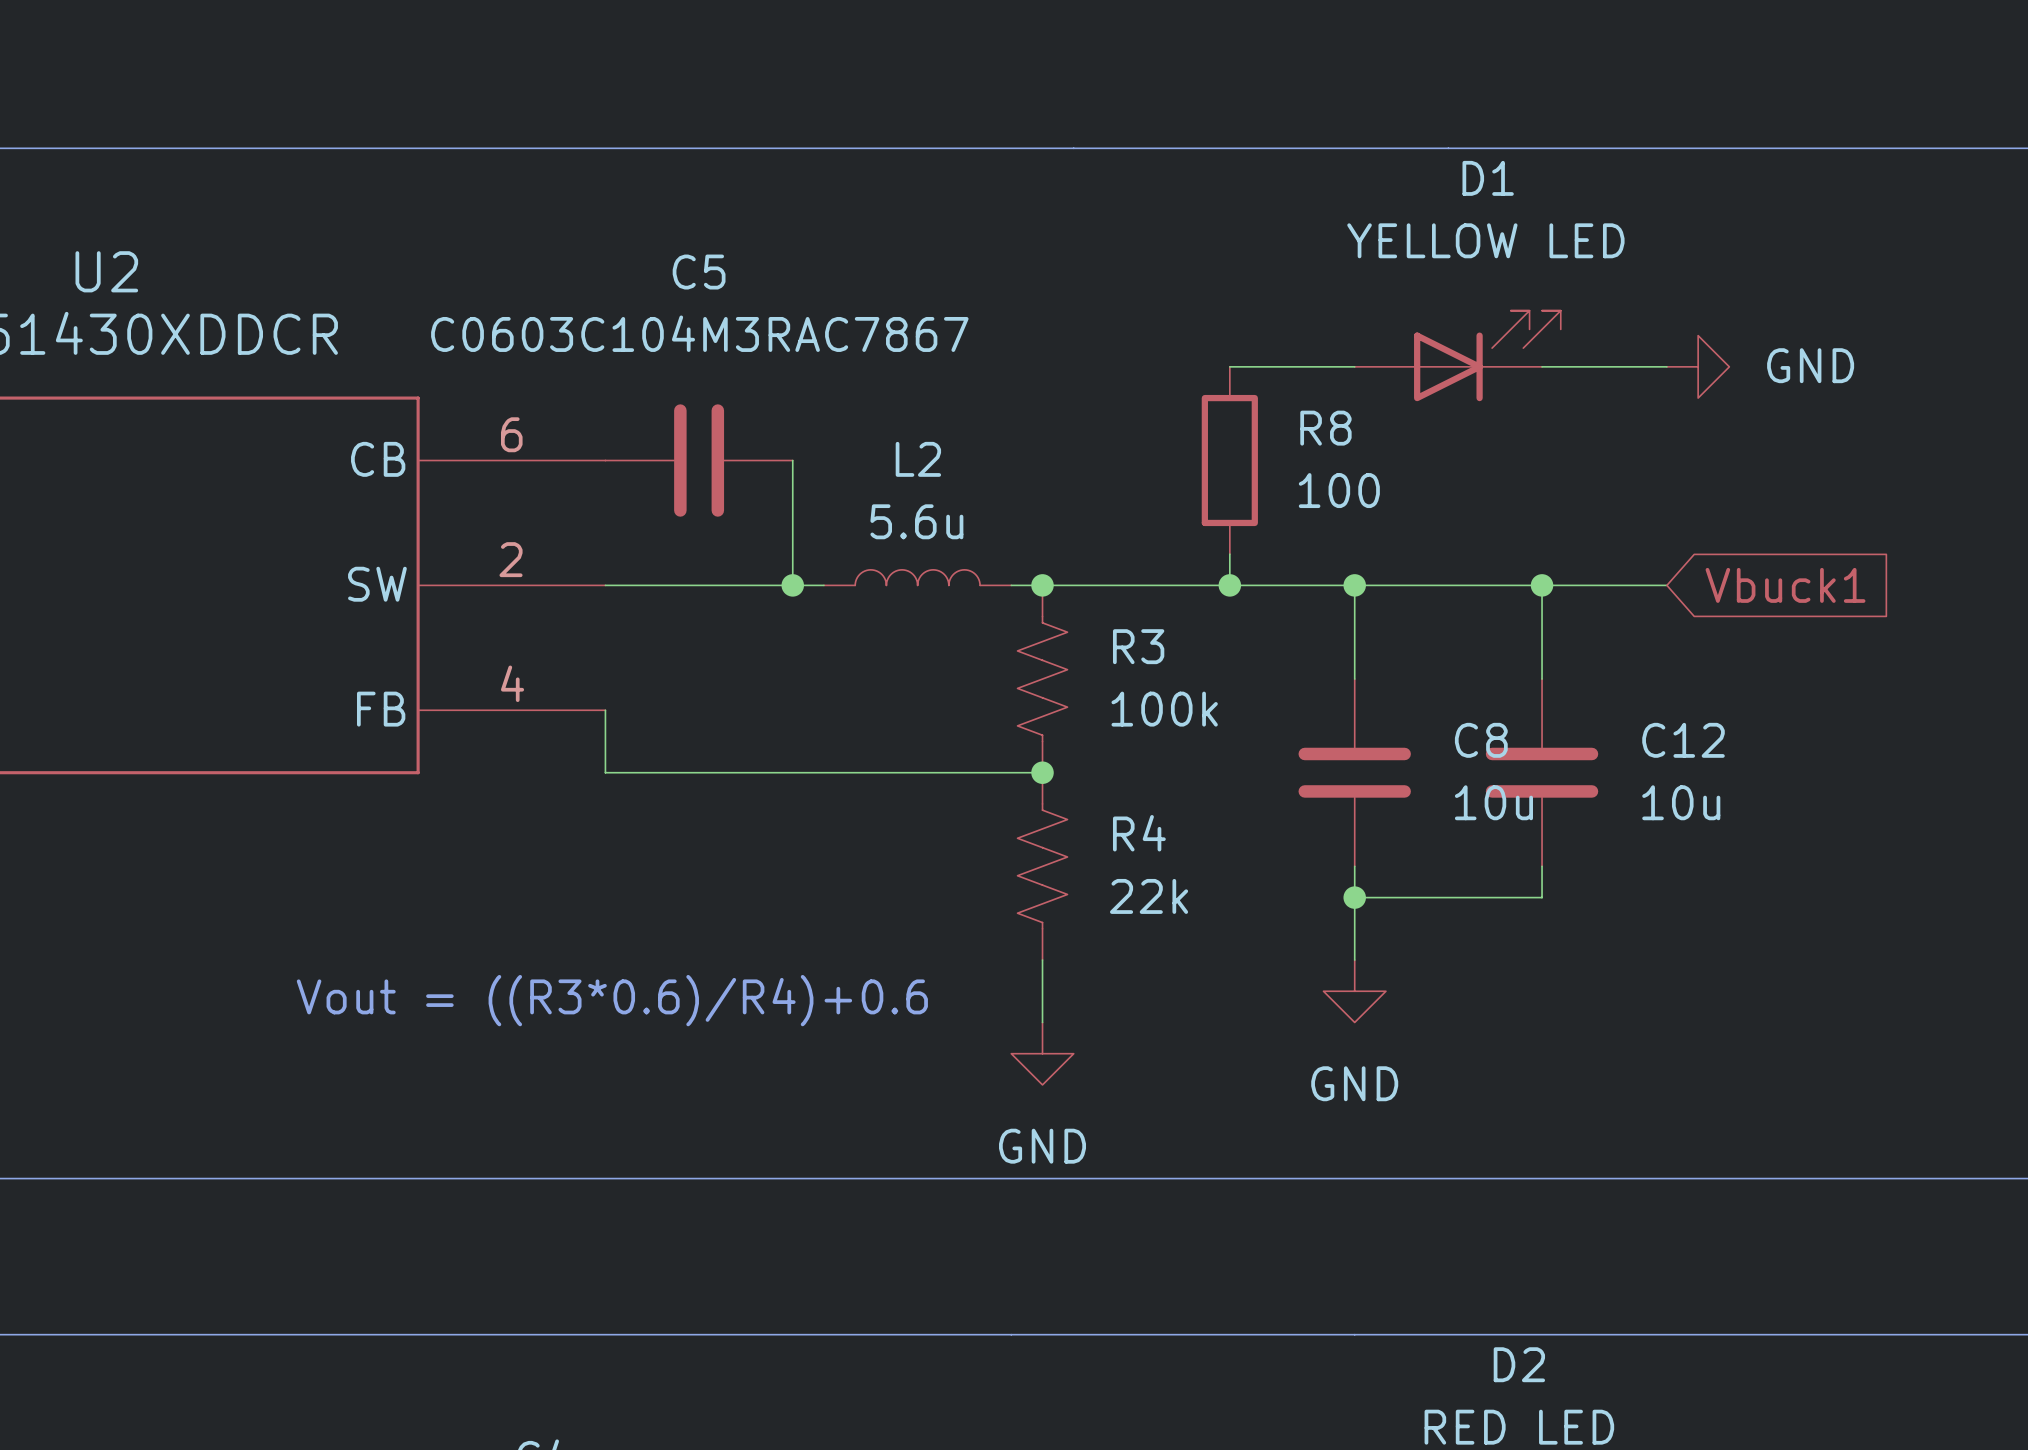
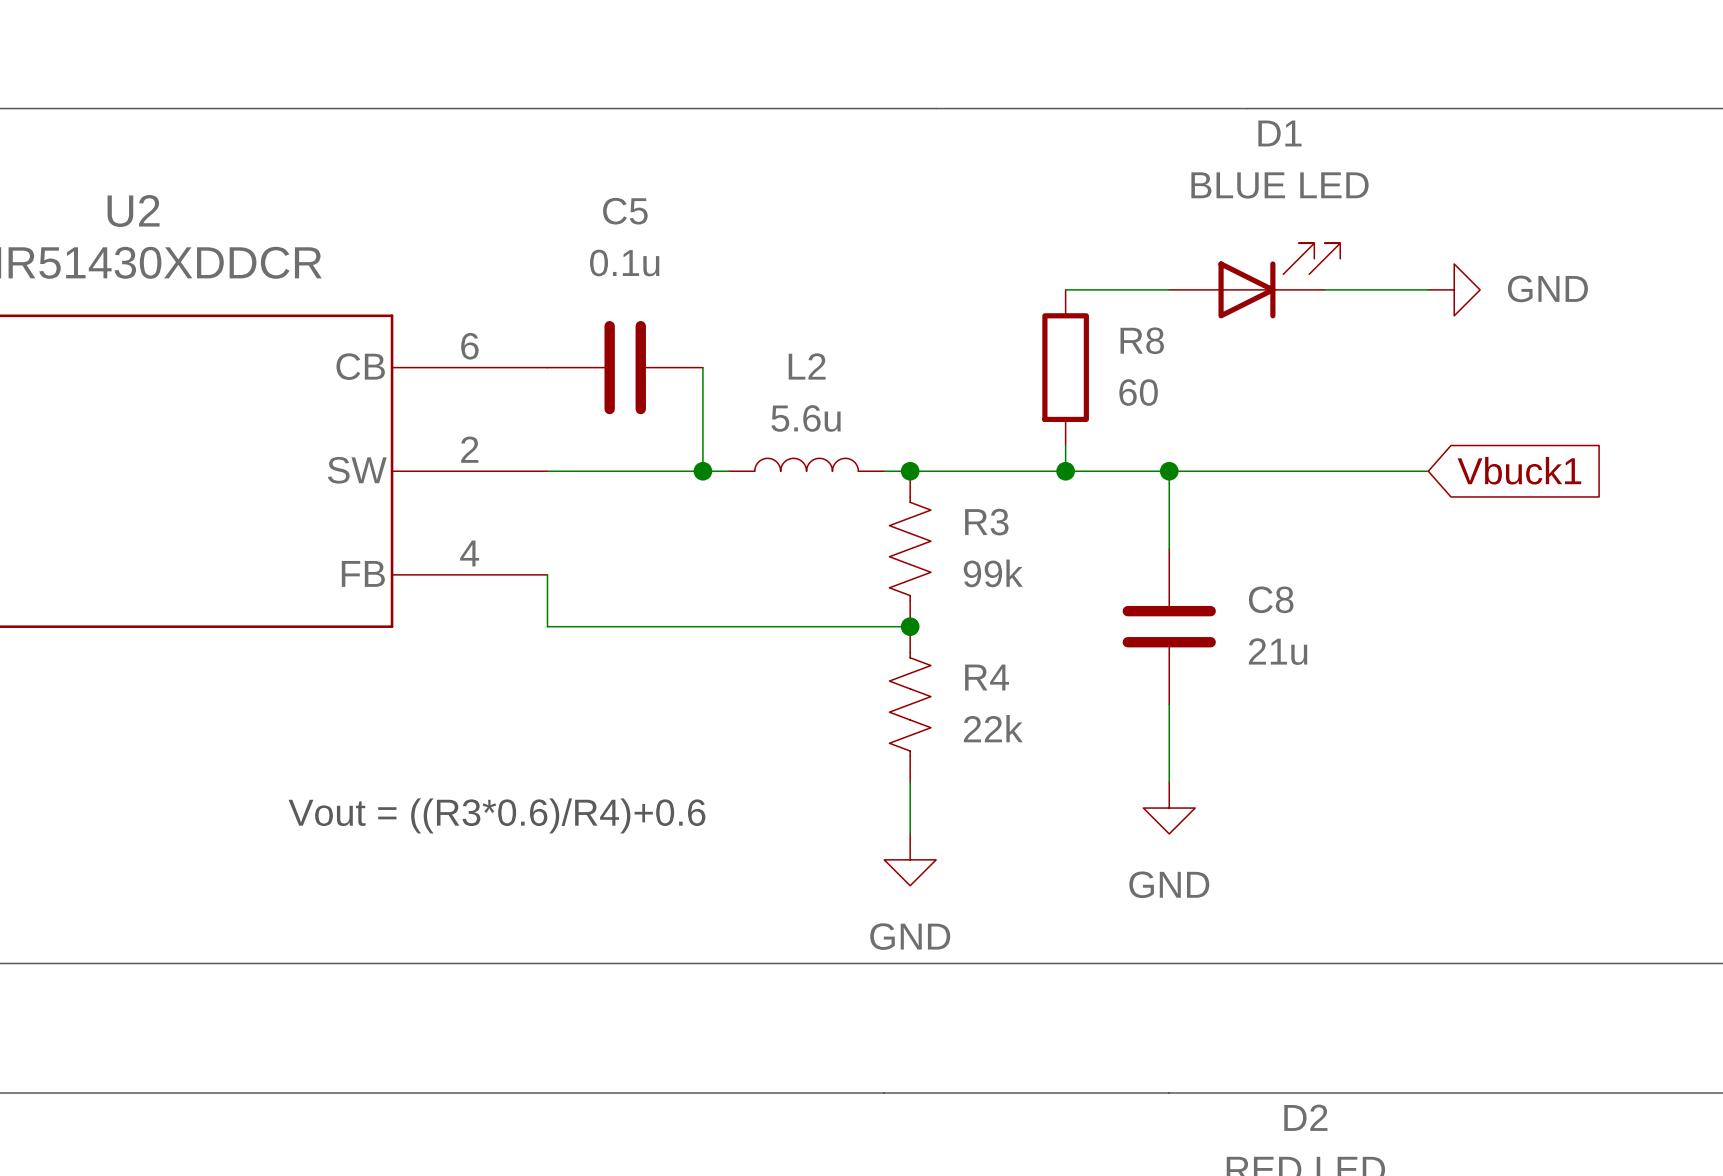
D1 value: YELLOW LED (1485, 240) -> BLUE LED (1280, 185)
C5 value: C0603C104M3RAC7867 (699, 333) -> 0.1u (624, 263)
R8 value: 100 (1339, 490) -> 60 (1138, 392)
wire: (1542, 585) (1542, 679) -> none
junction: (1542, 585) -> none
R3 value: 100k (1164, 709) -> 99k (993, 573)
C12: 10u (1542, 772) -> none
C8 value: 10u (1493, 802) -> 21u (1278, 651)
wire: (1542, 866) (1542, 897) (1354, 897) -> none
junction: (1354, 897) -> none

